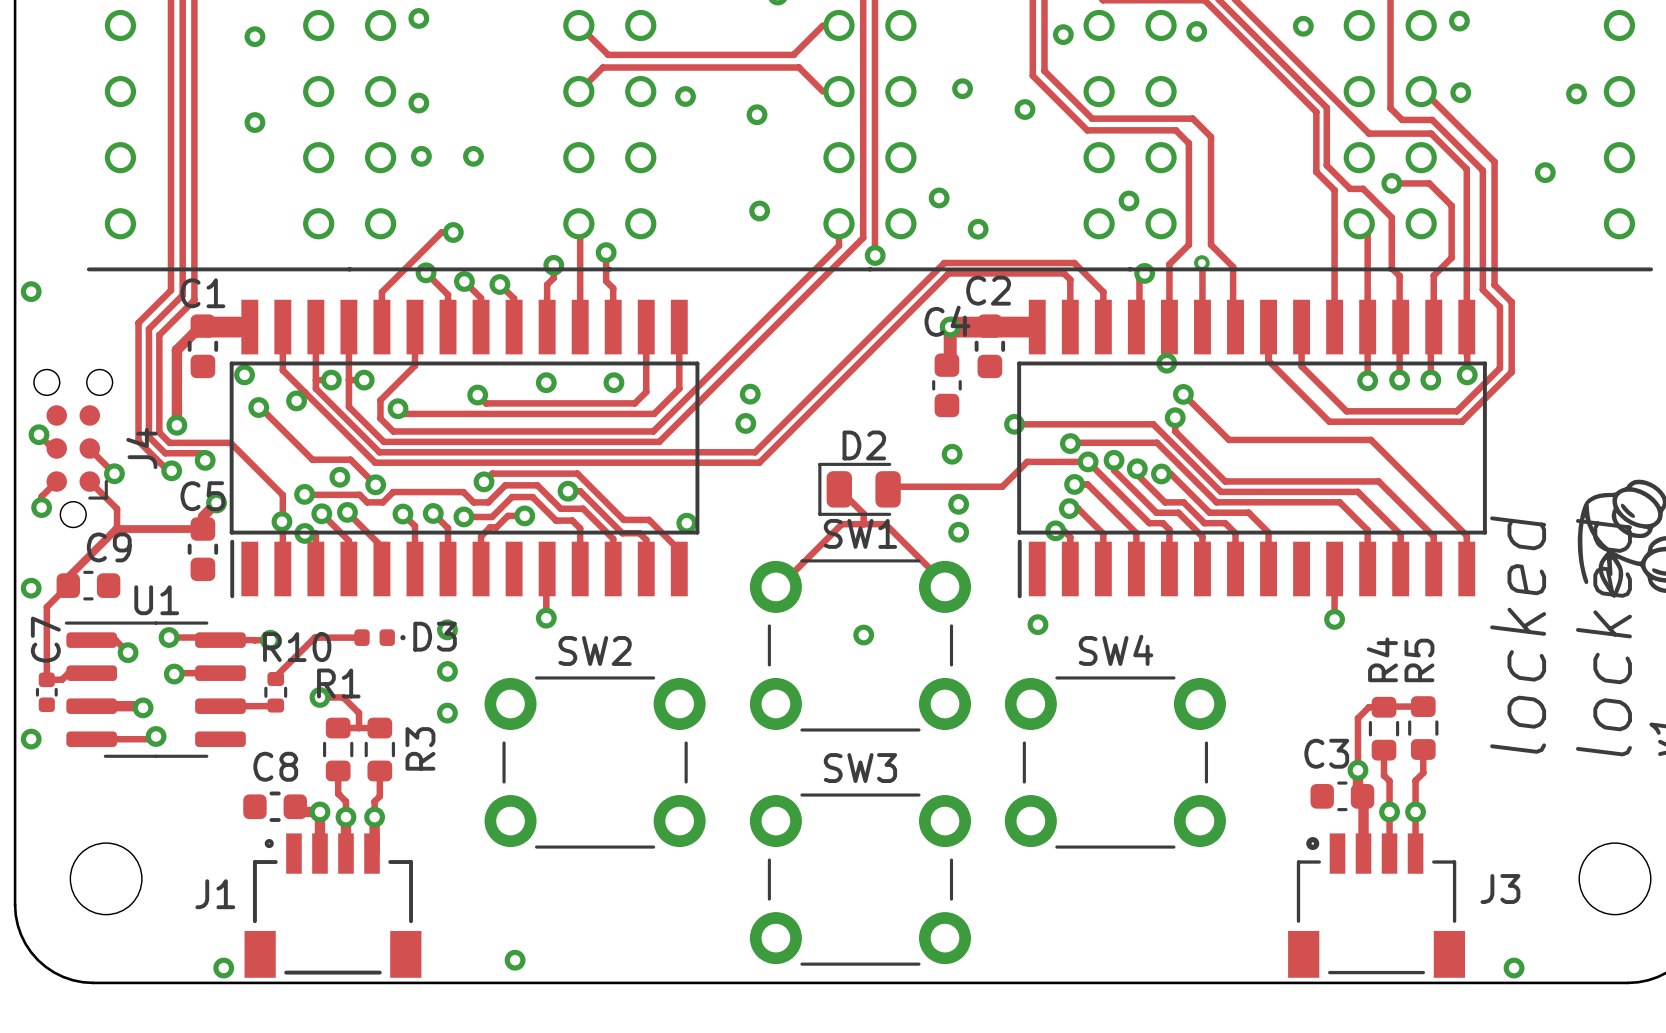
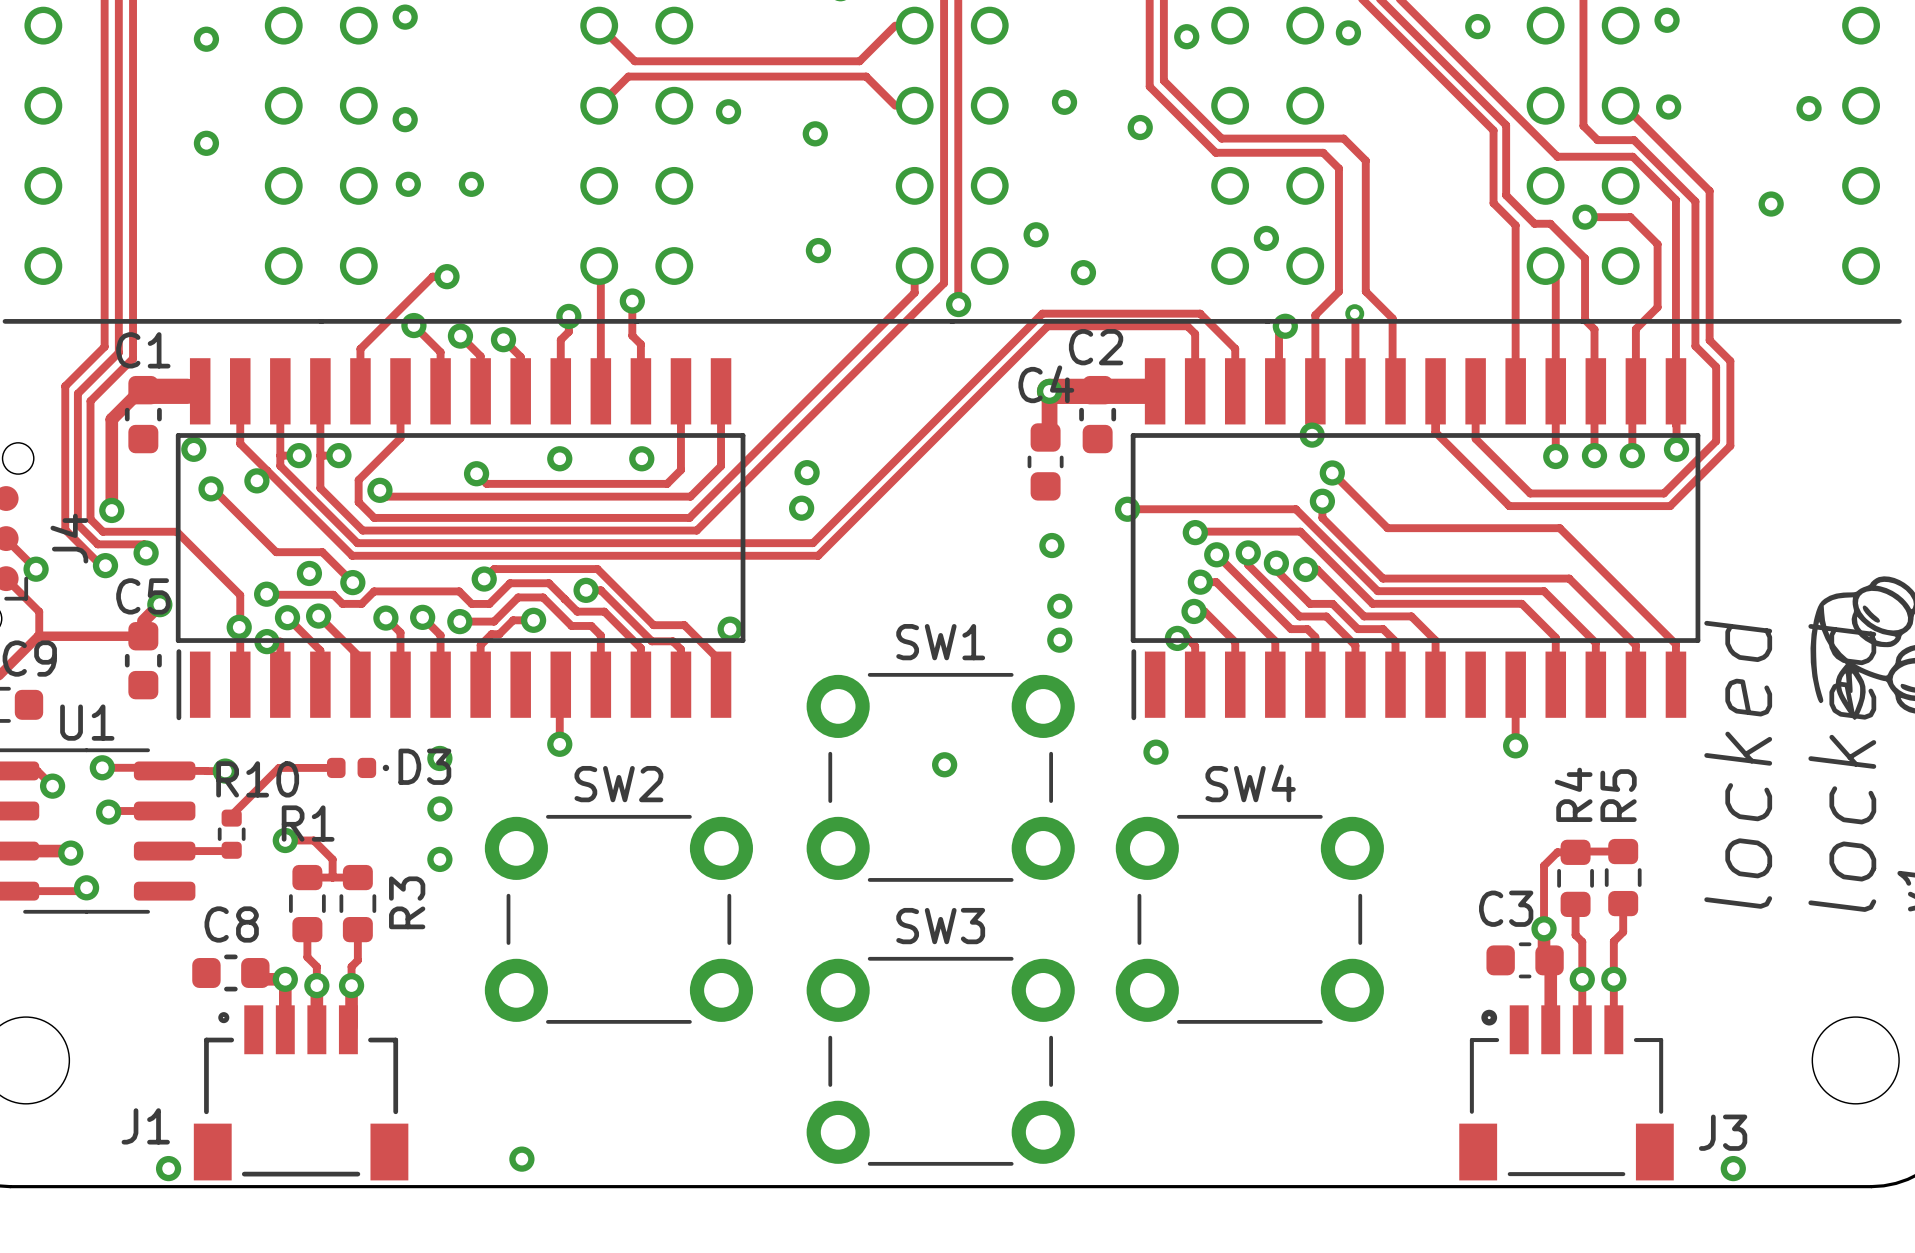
track: (1088, 461) (1027, 461) (1002, 486) (890, 486) (888, 489) -> none
track: (839, 489) (863, 513) (863, 524) -> none
D2: (859, 489) -> none
track: (779, 586) (841, 524) (885, 524) (948, 586) -> none
J3 name position: J3 (1500, 889) -> J3 (1723, 1132)
J1 name position: J1 (215, 894) -> J1 (145, 1126)

